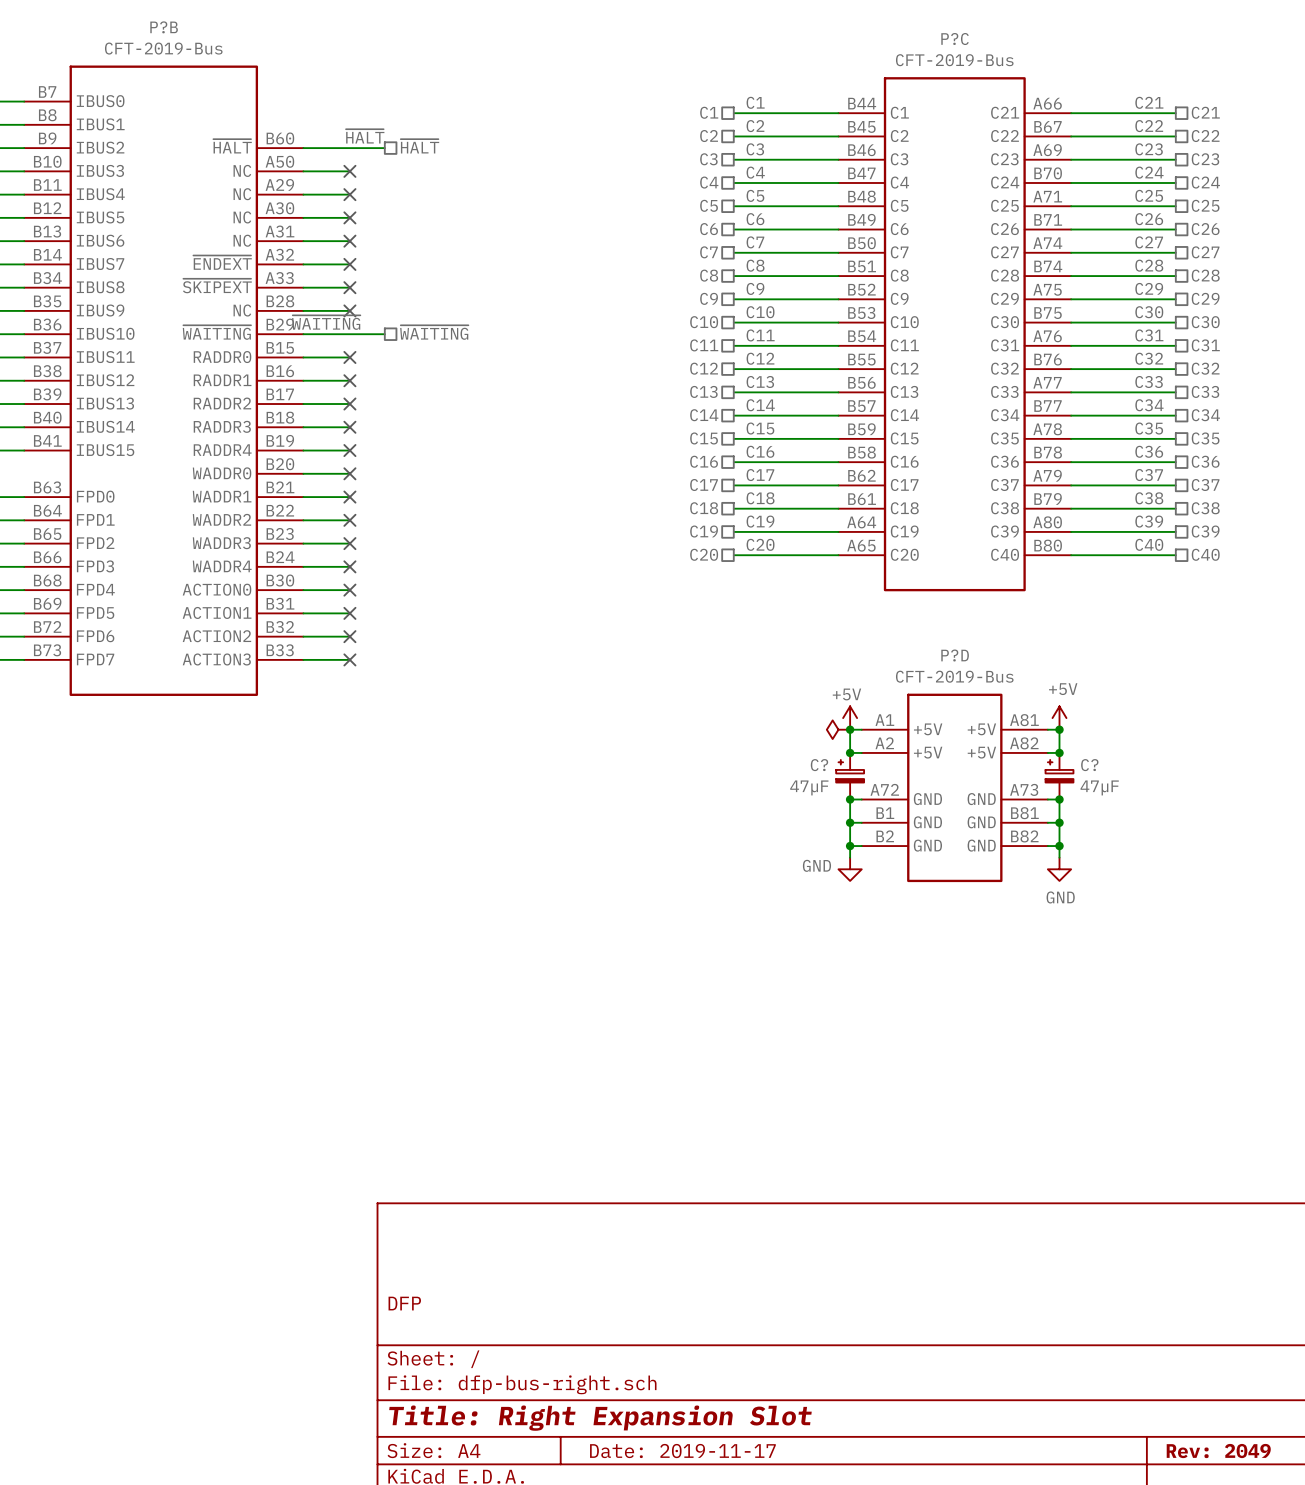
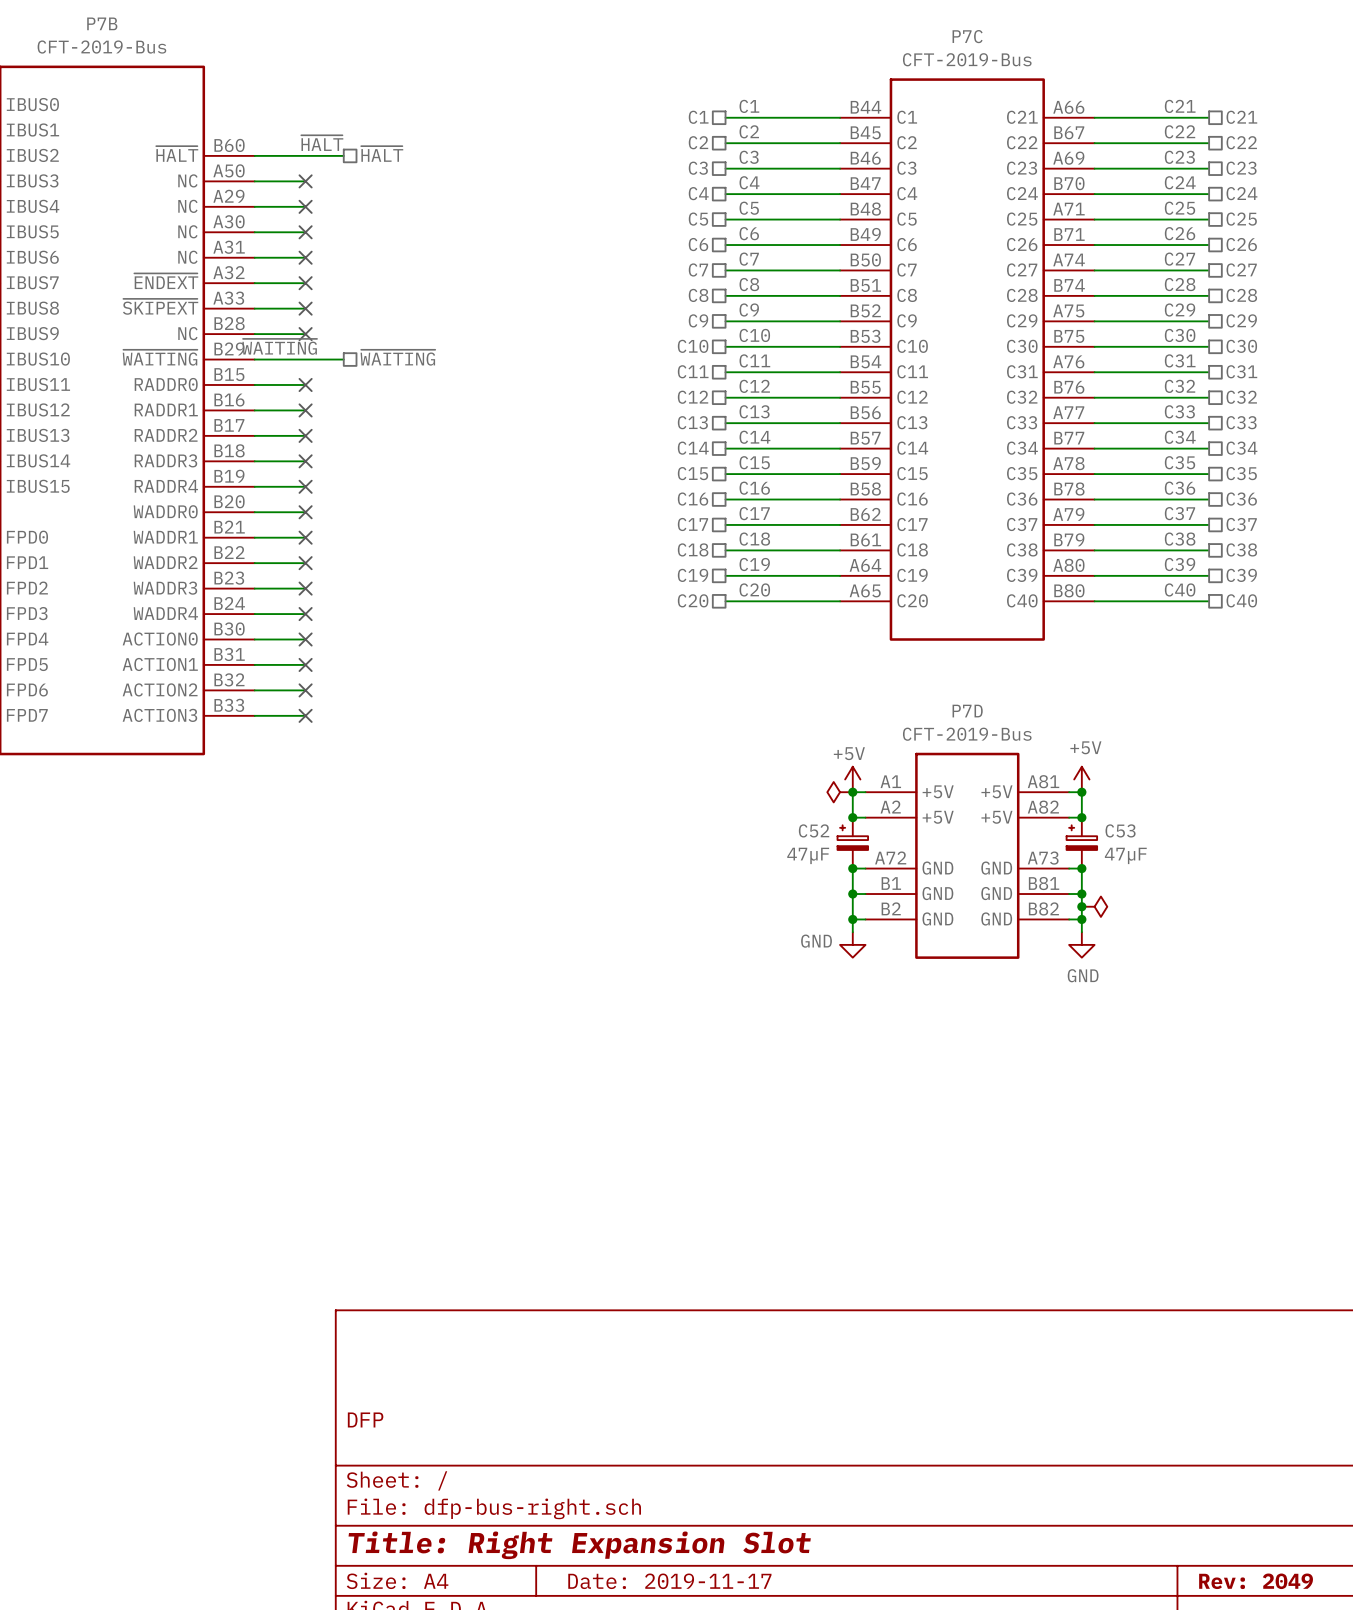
P?B name: P?B (164, 27) -> P7B (102, 23)
P?C name: P?C (955, 39) -> P7C (967, 36)
P?D name: P?D (955, 655) -> P7D (967, 711)
C? name: C? (819, 765) -> C52 (814, 830)
C? name: C? (1089, 765) -> C53 (1120, 830)
junction: none -> (1081, 906)
power symbol: none -> (1094, 906)

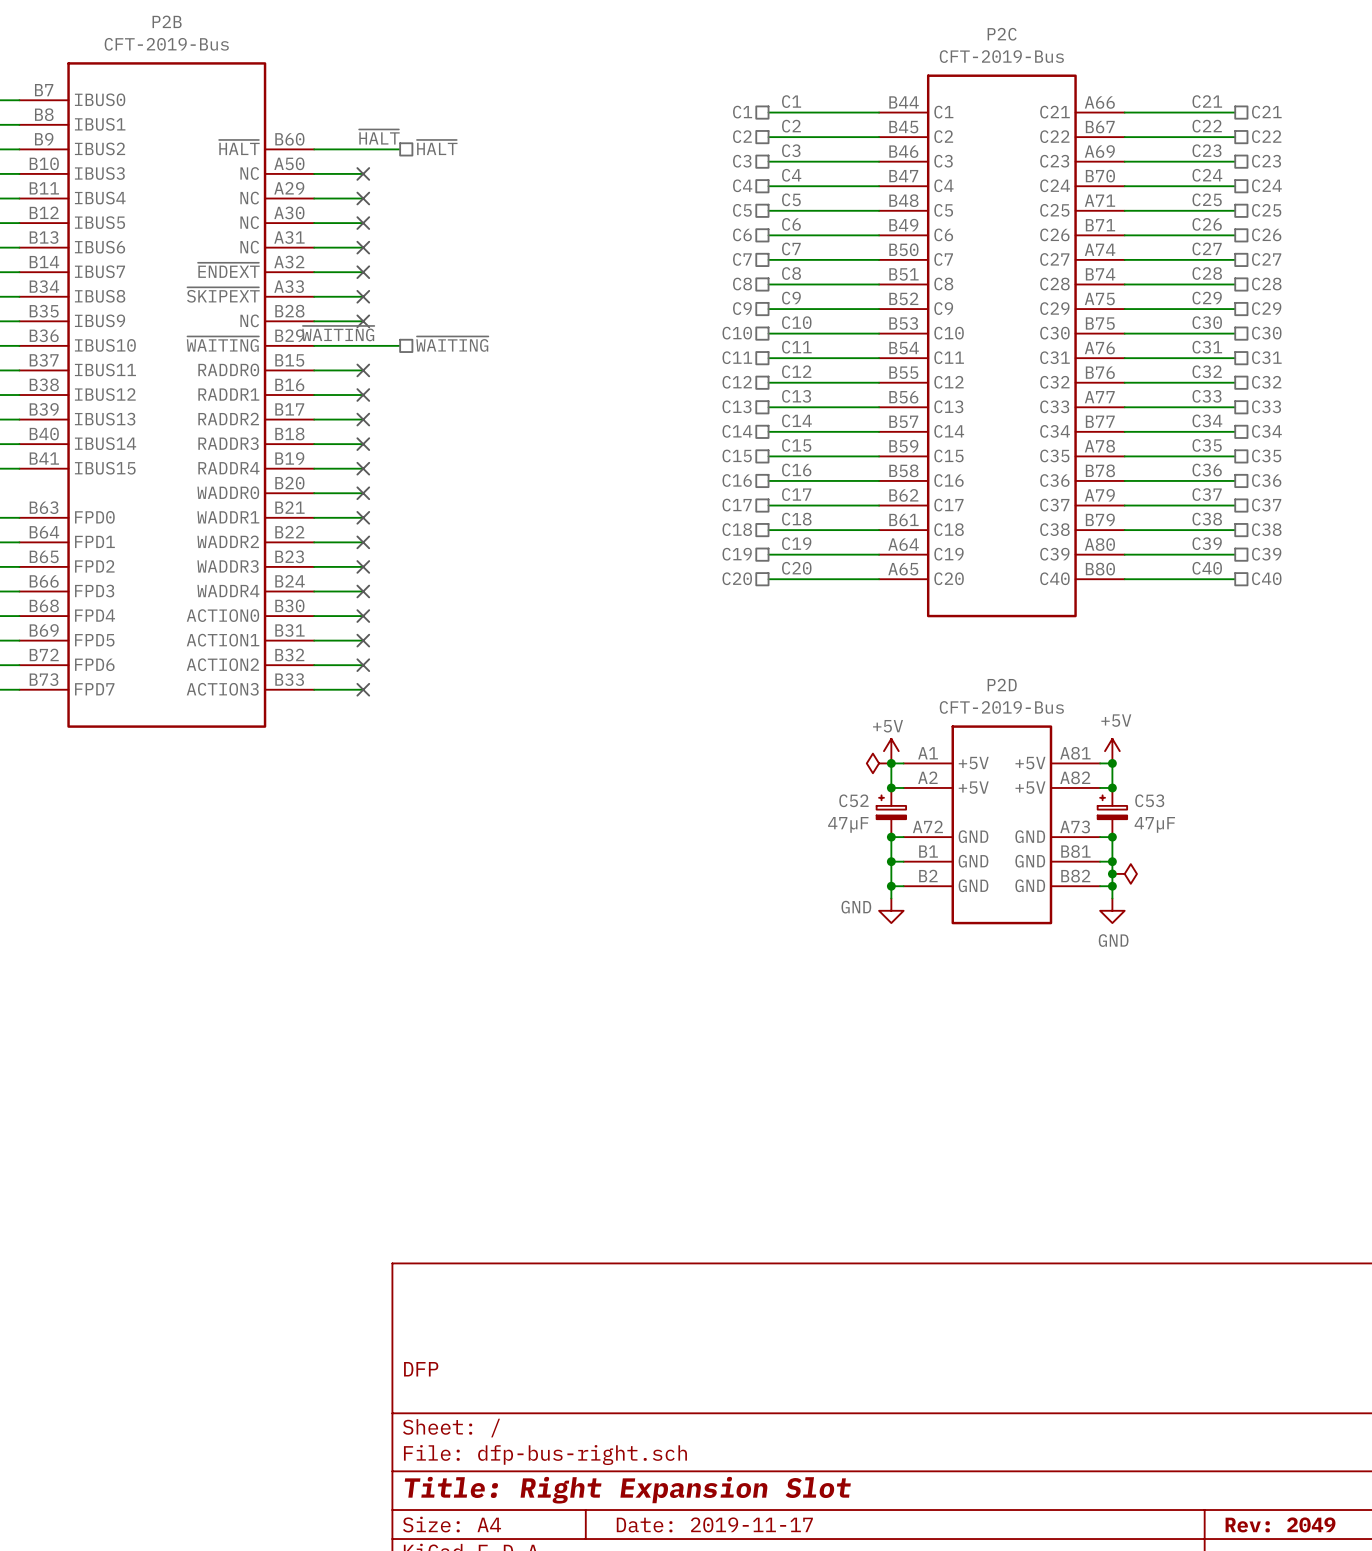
P7B name: P7B (102, 23) -> P2B (167, 21)
P7C name: P7C (967, 36) -> P2C (1002, 34)
P7D name: P7D (967, 711) -> P2D (1002, 685)

